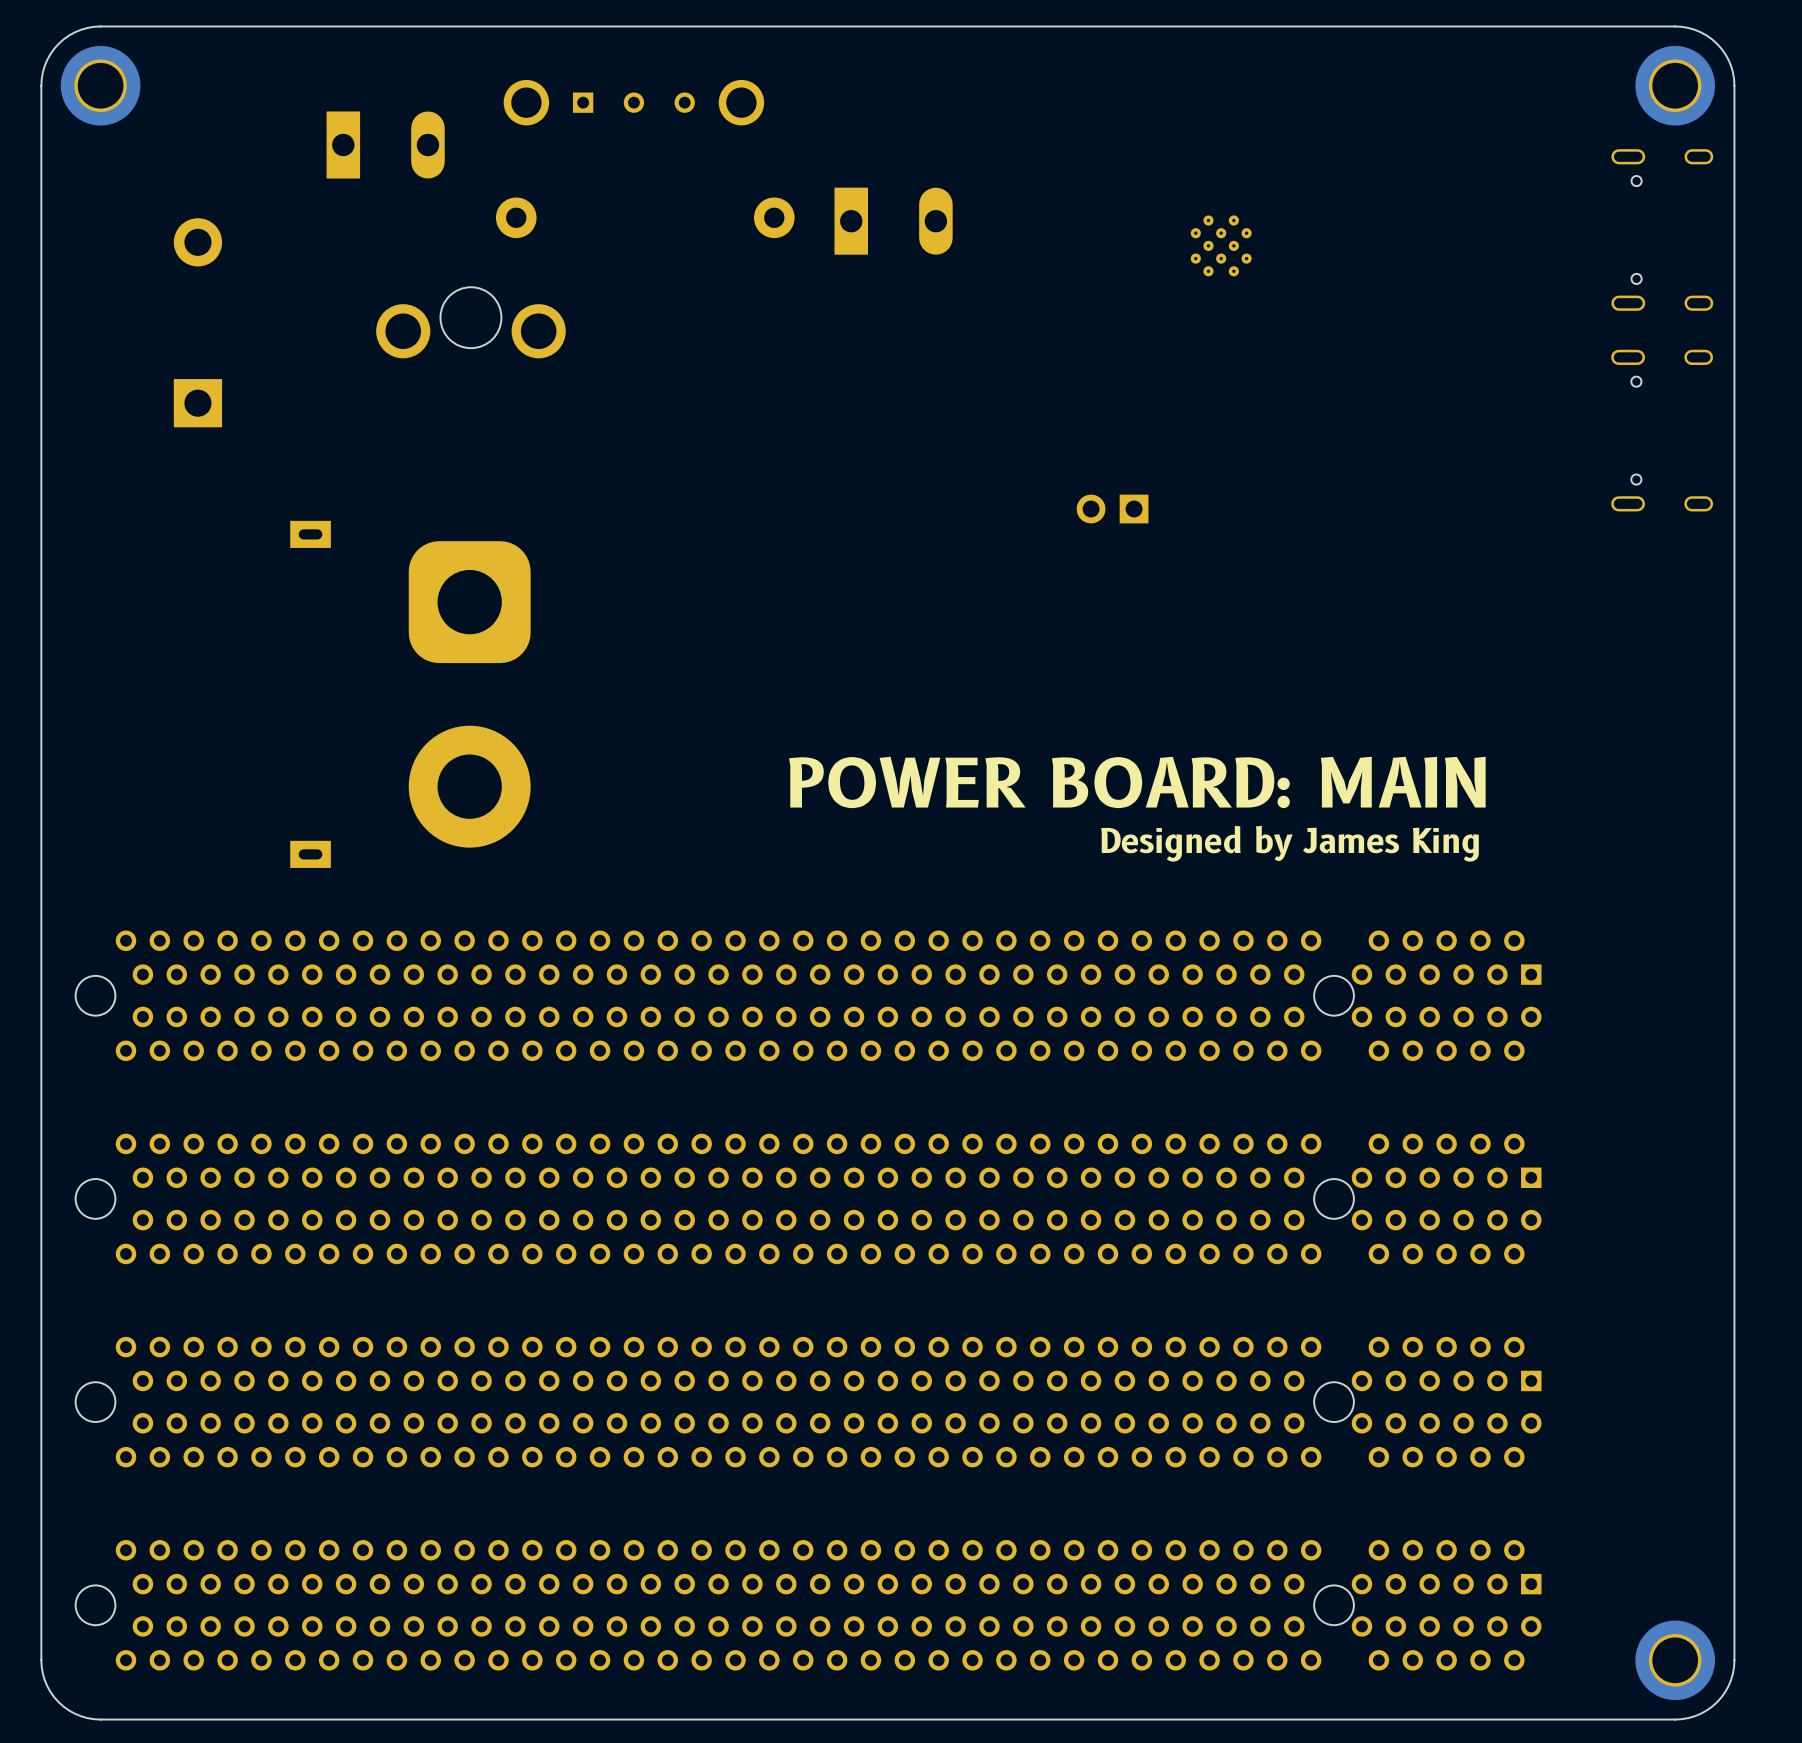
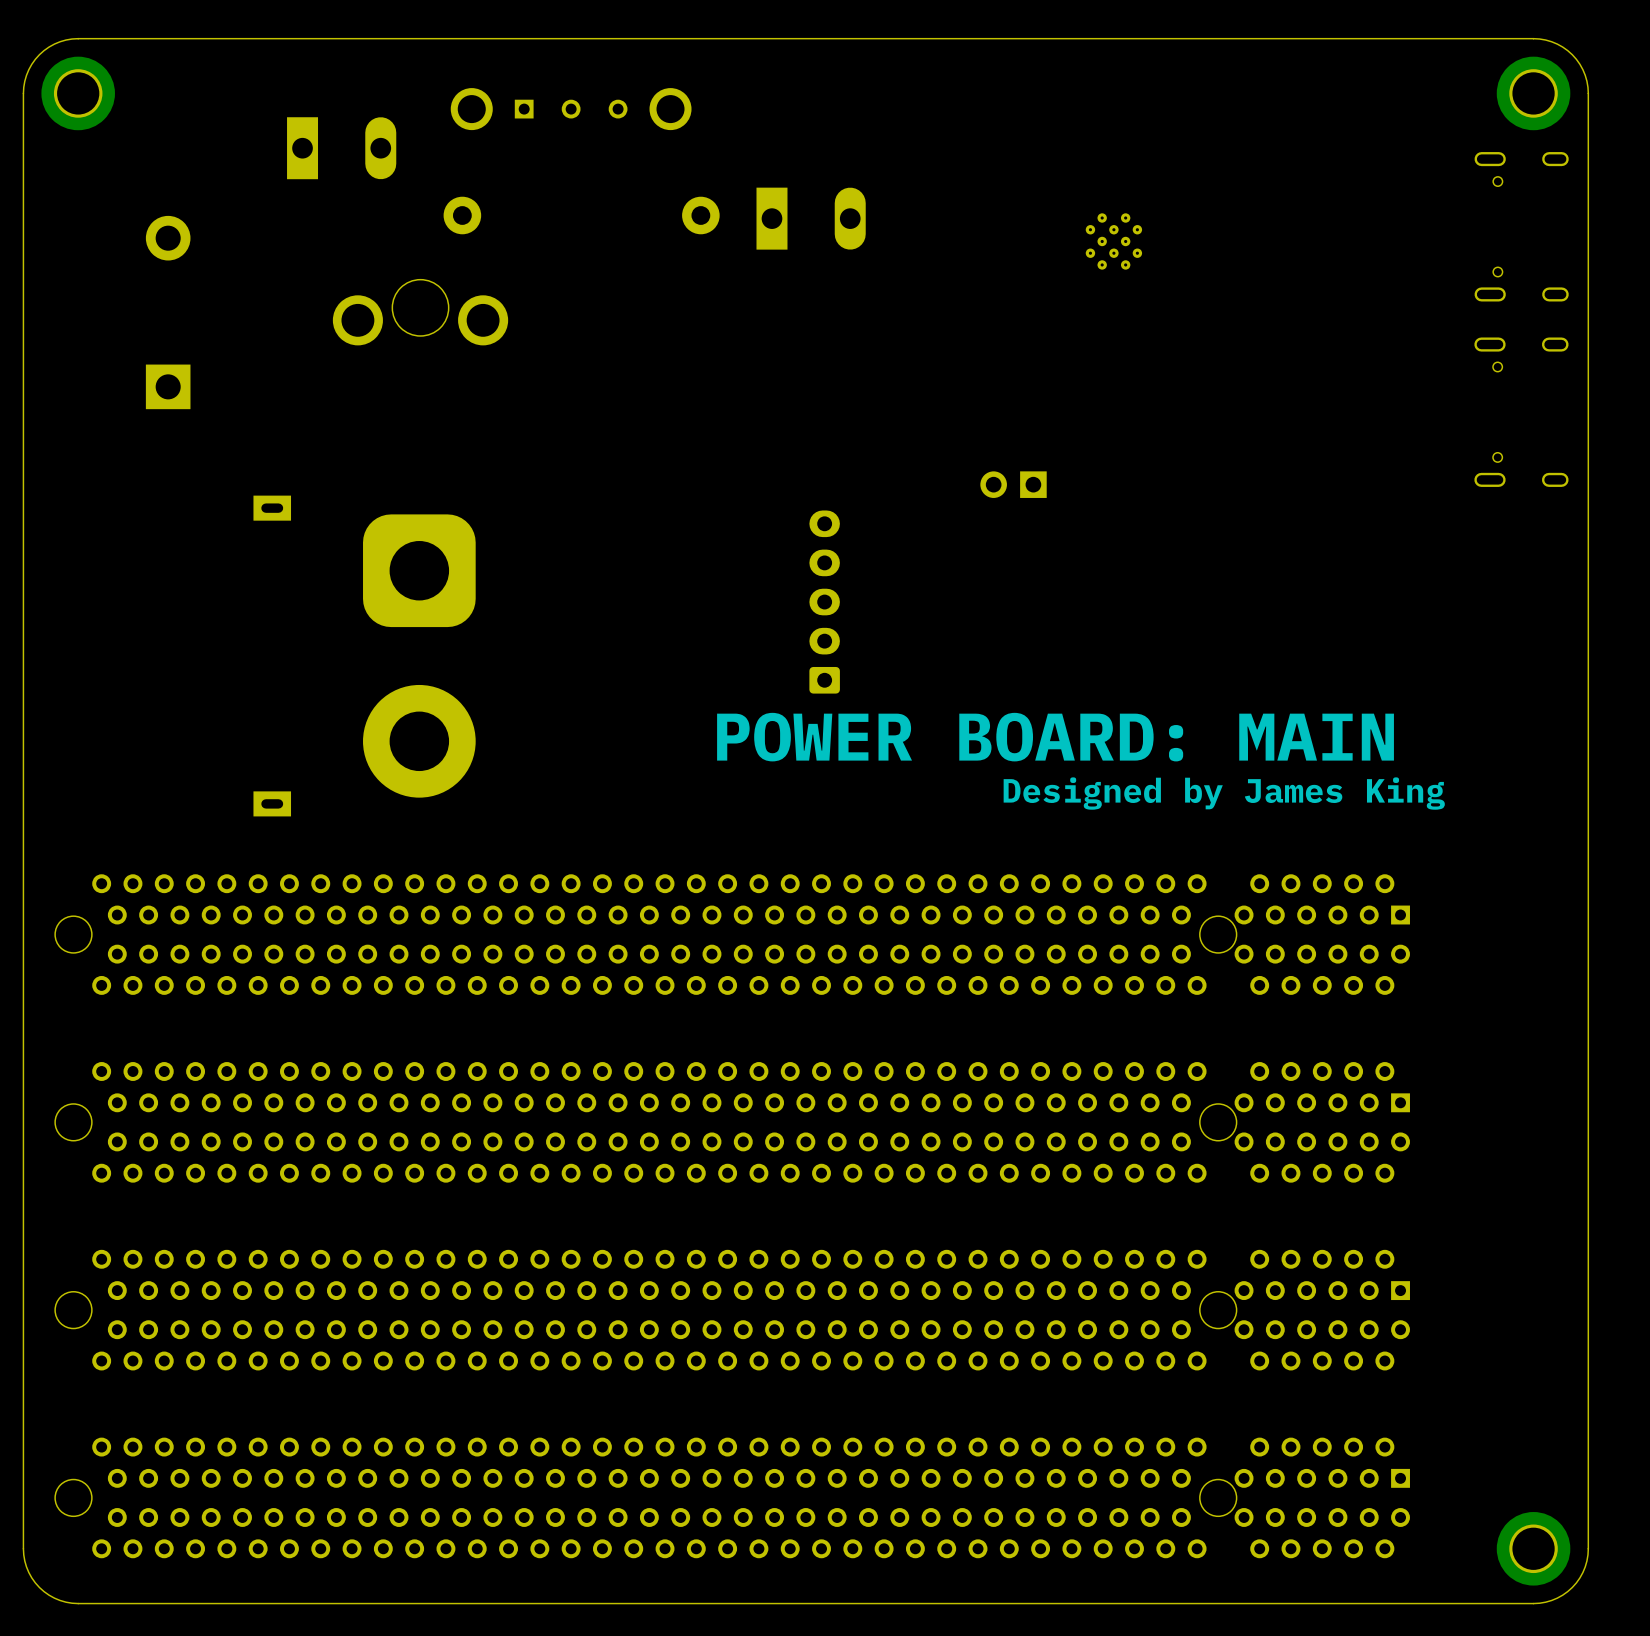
part: none -> (824, 602)

